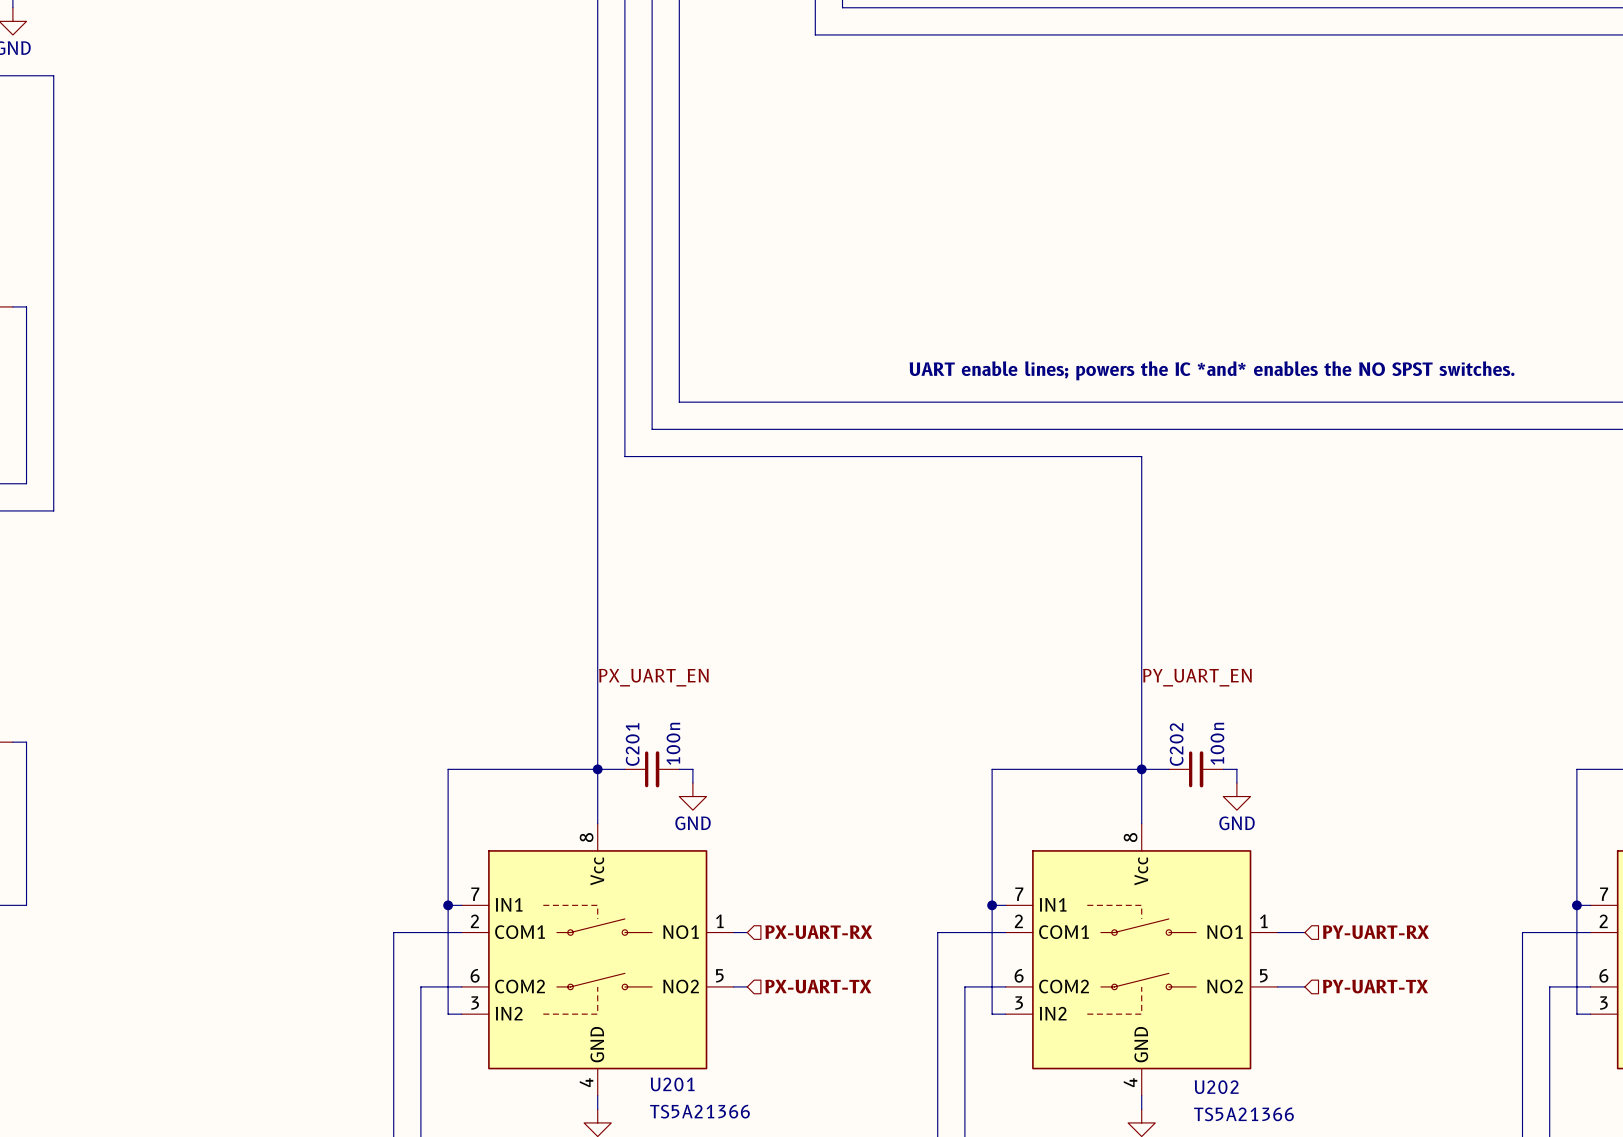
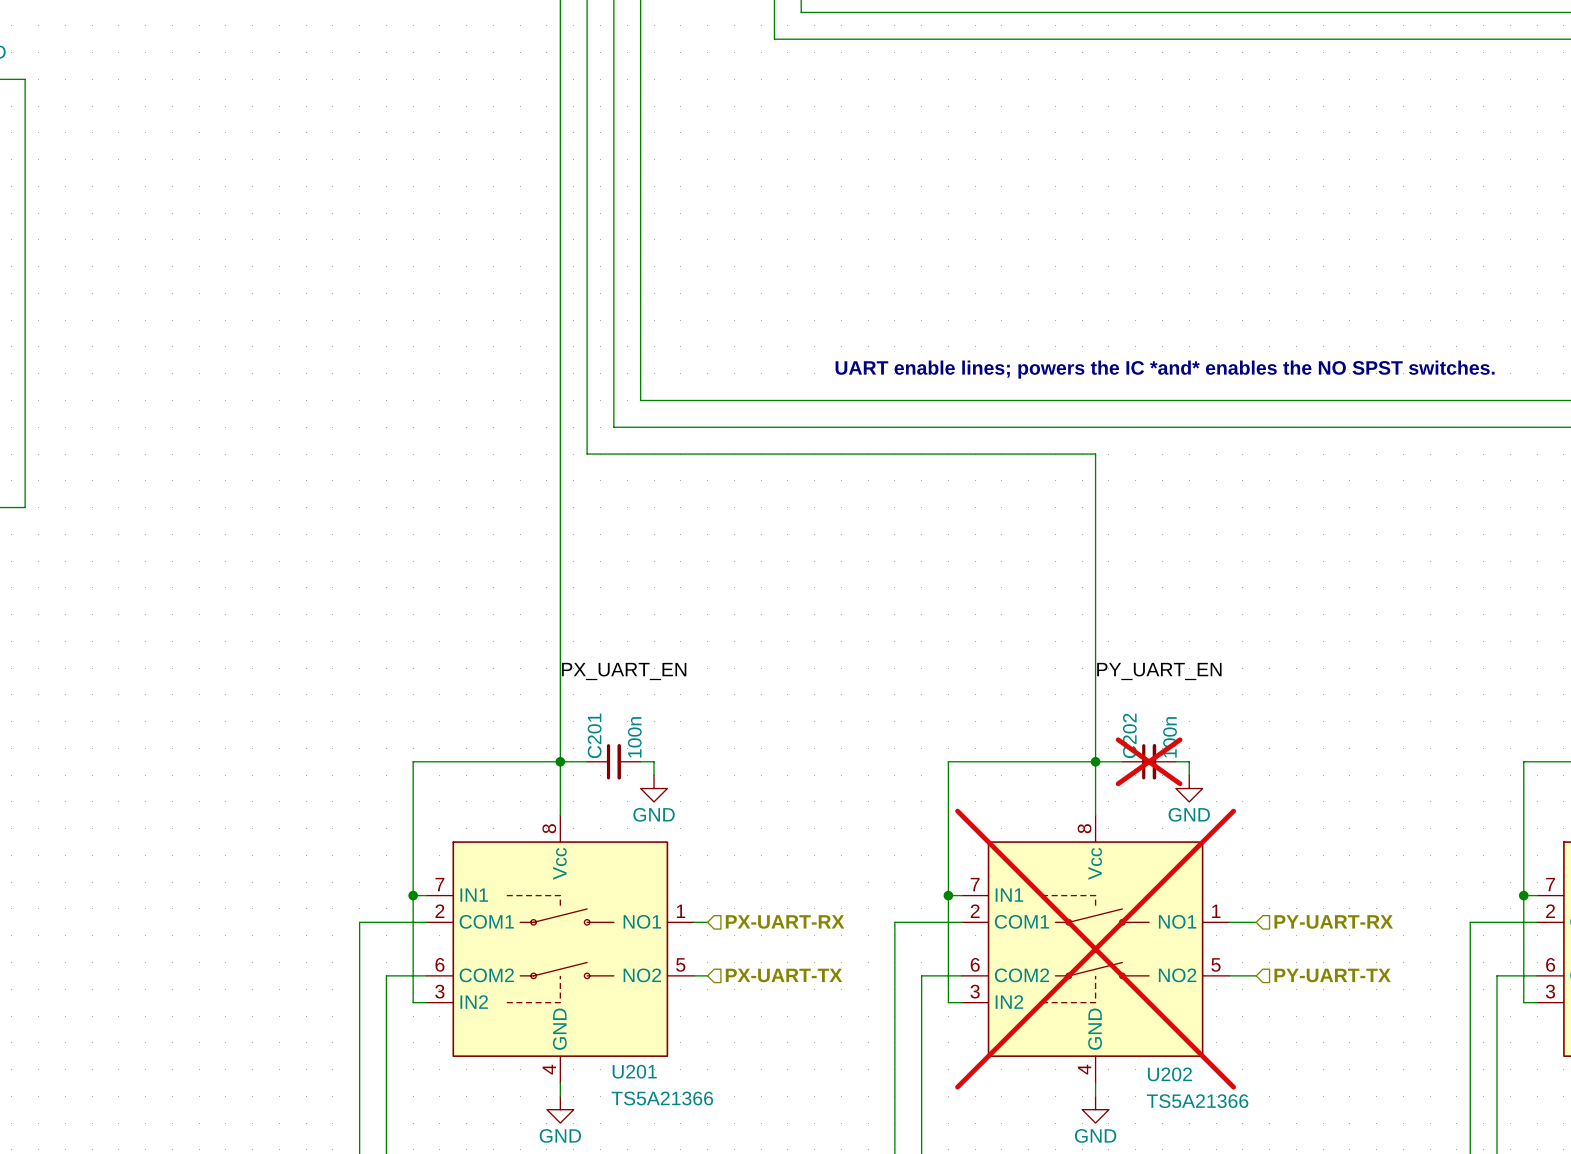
C202 do-not-place cross: none -> (1149, 761)
U202 do-not-place cross: none -> (1095, 949)

